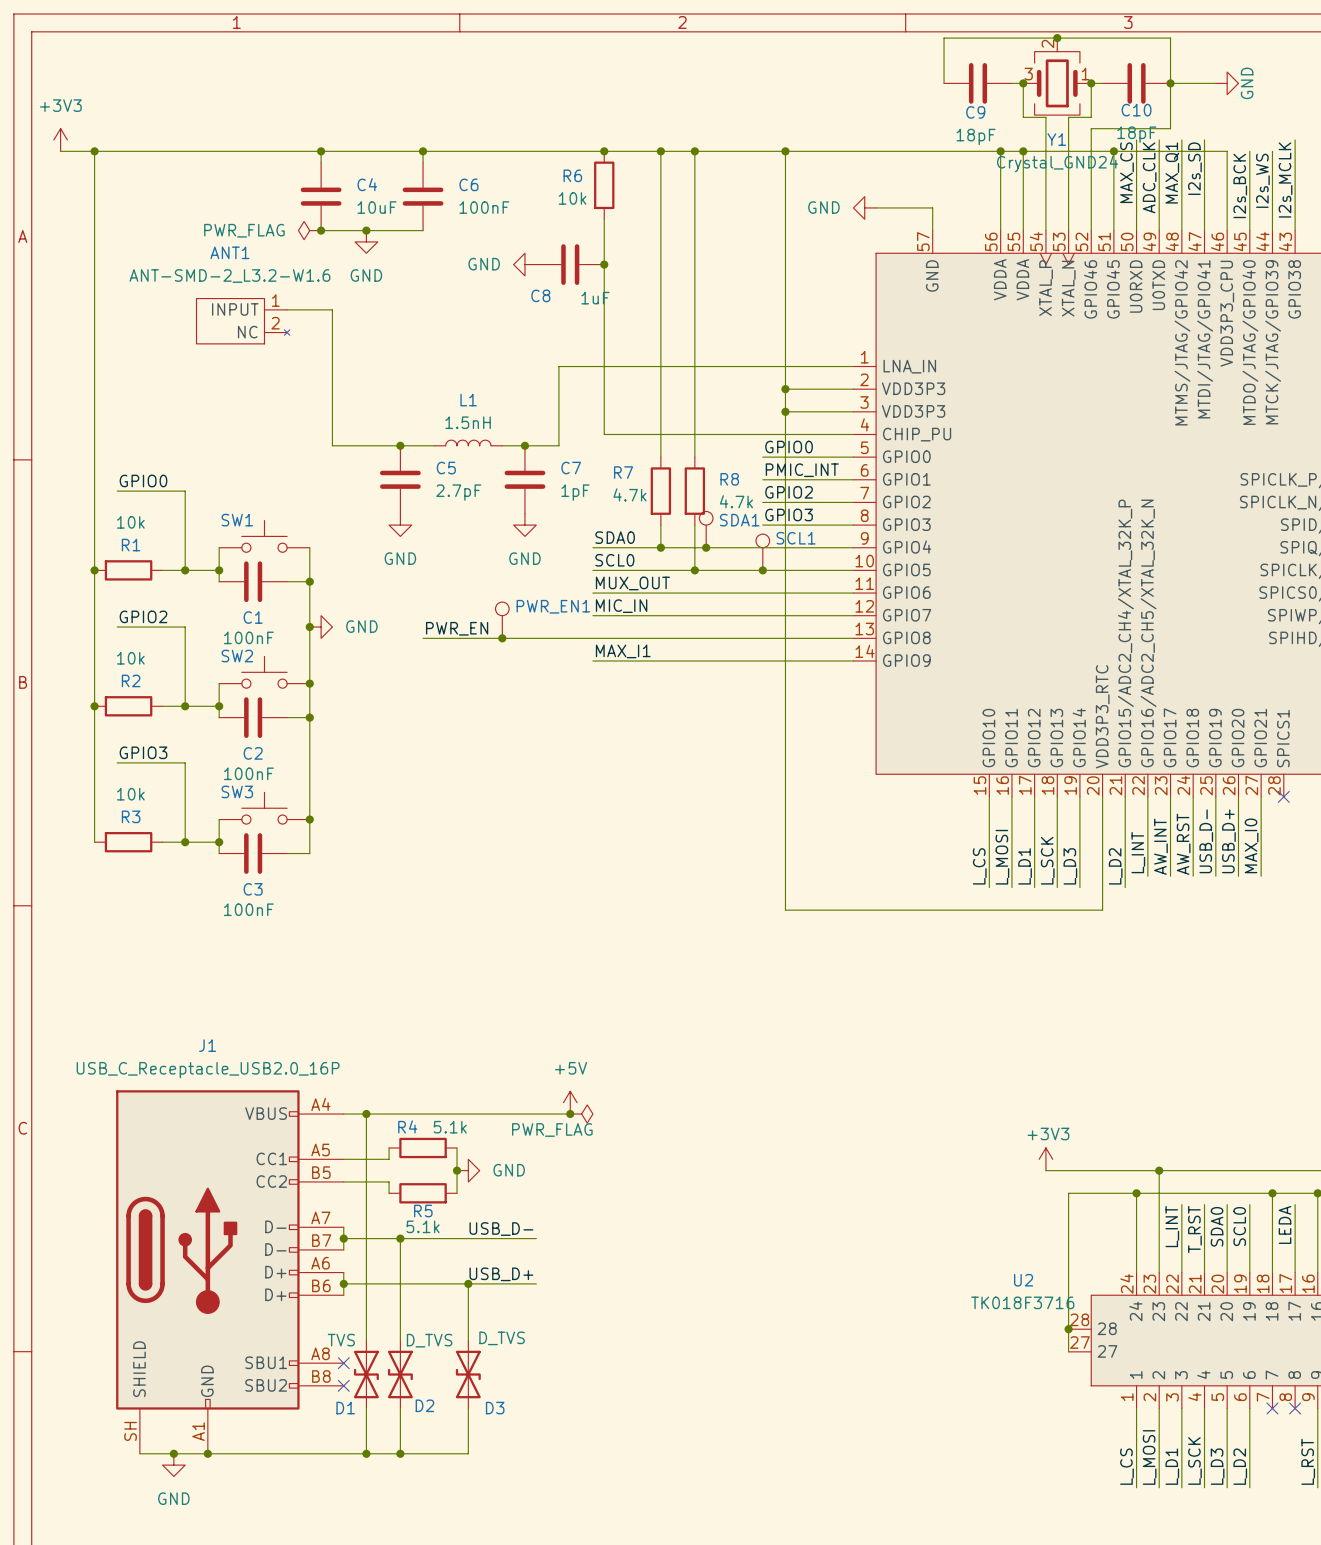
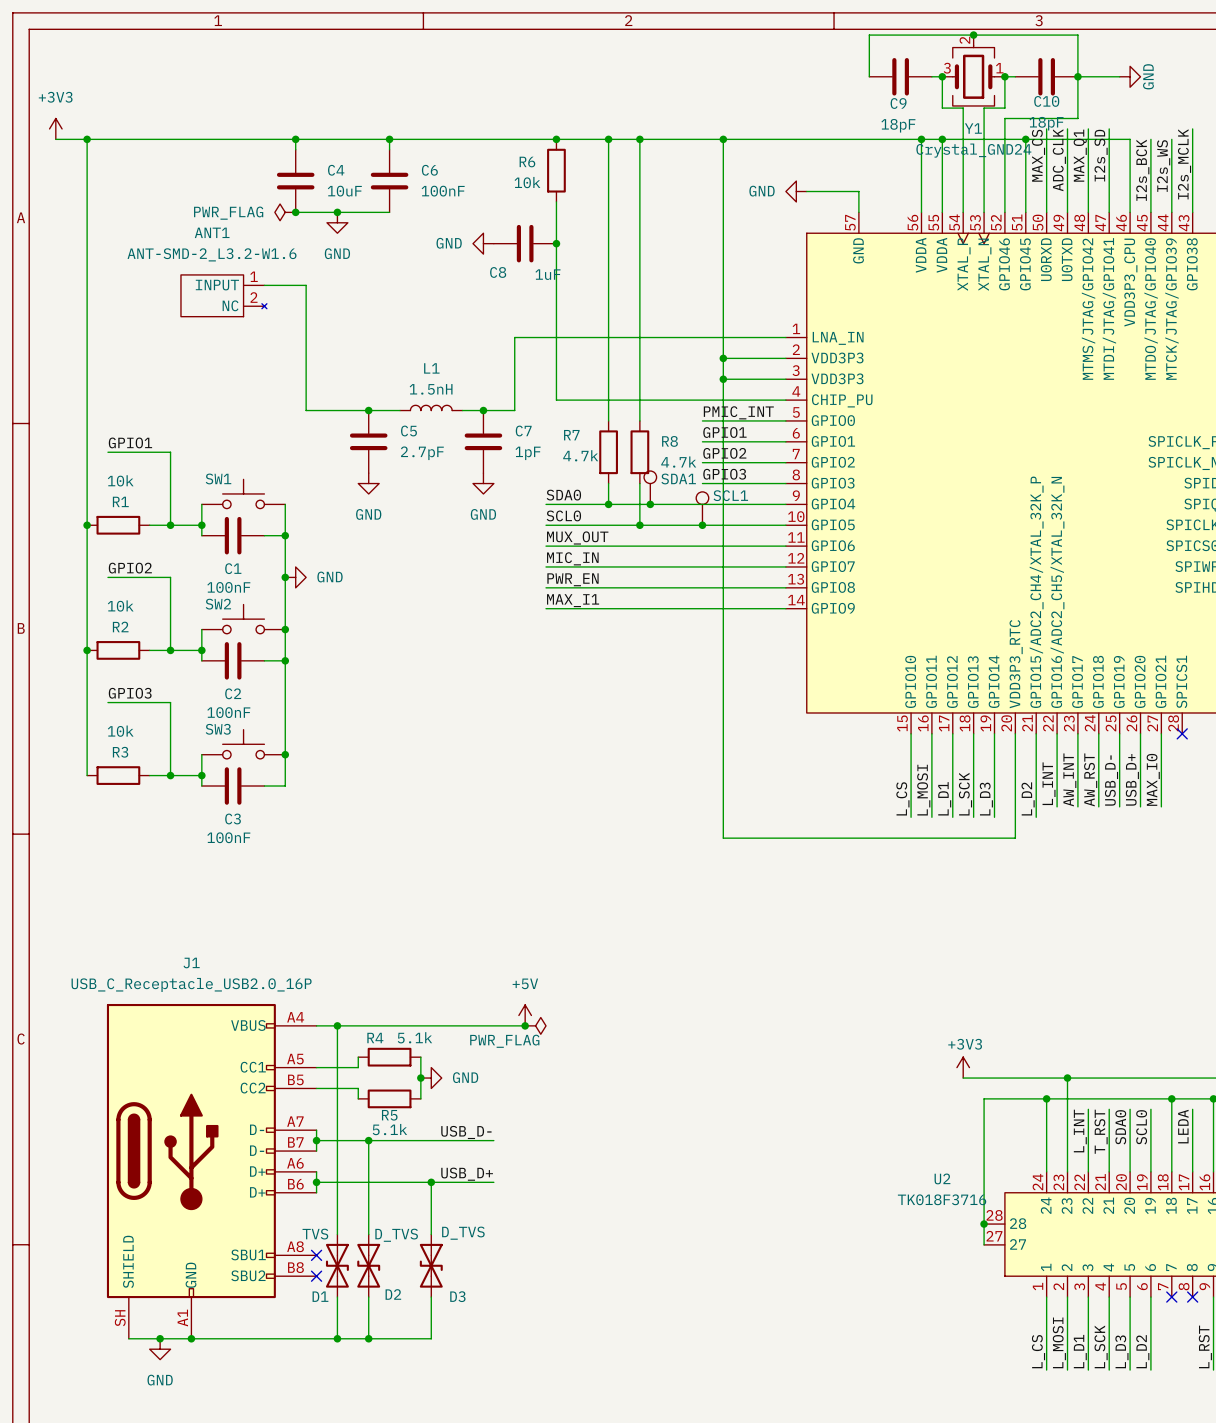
label: GPIO0 (789, 447) -> PMIC_INT (738, 412)
label: PMIC_INT (802, 470) -> GPIO1 (724, 432)
label: GPIO0 (143, 481) -> GPIO1 (130, 442)
PWR_EN1: (502, 620) -> none
label position: PWR_EN (457, 628) -> PWR_EN (572, 579)
wire: (423, 638) (592, 638) -> none
junction: (502, 638) -> none

